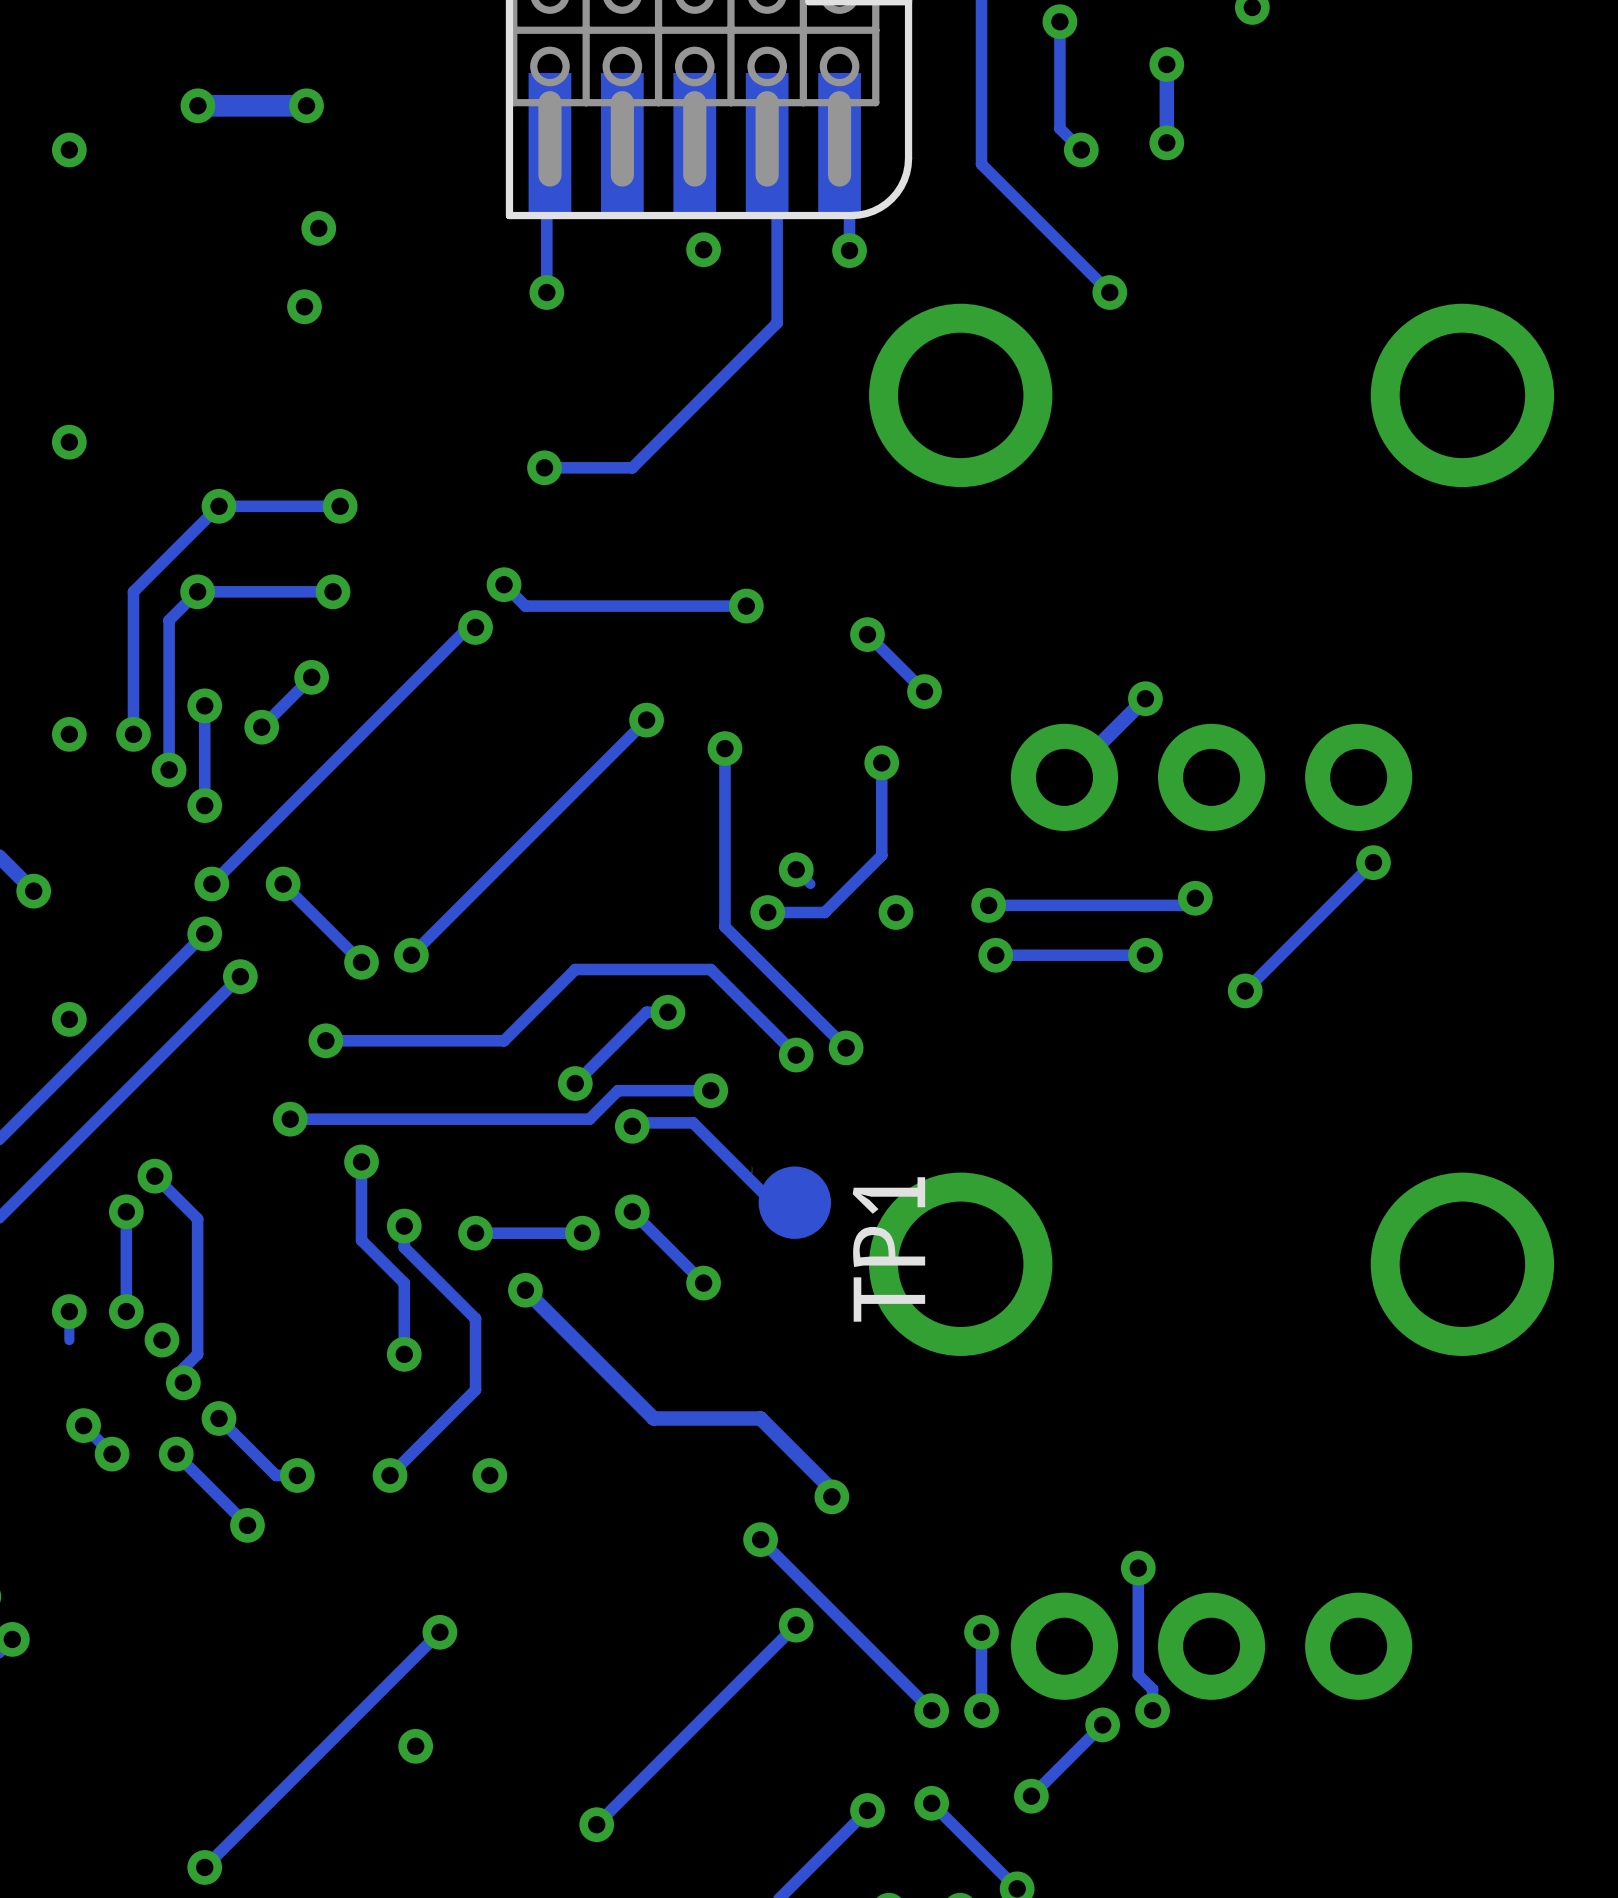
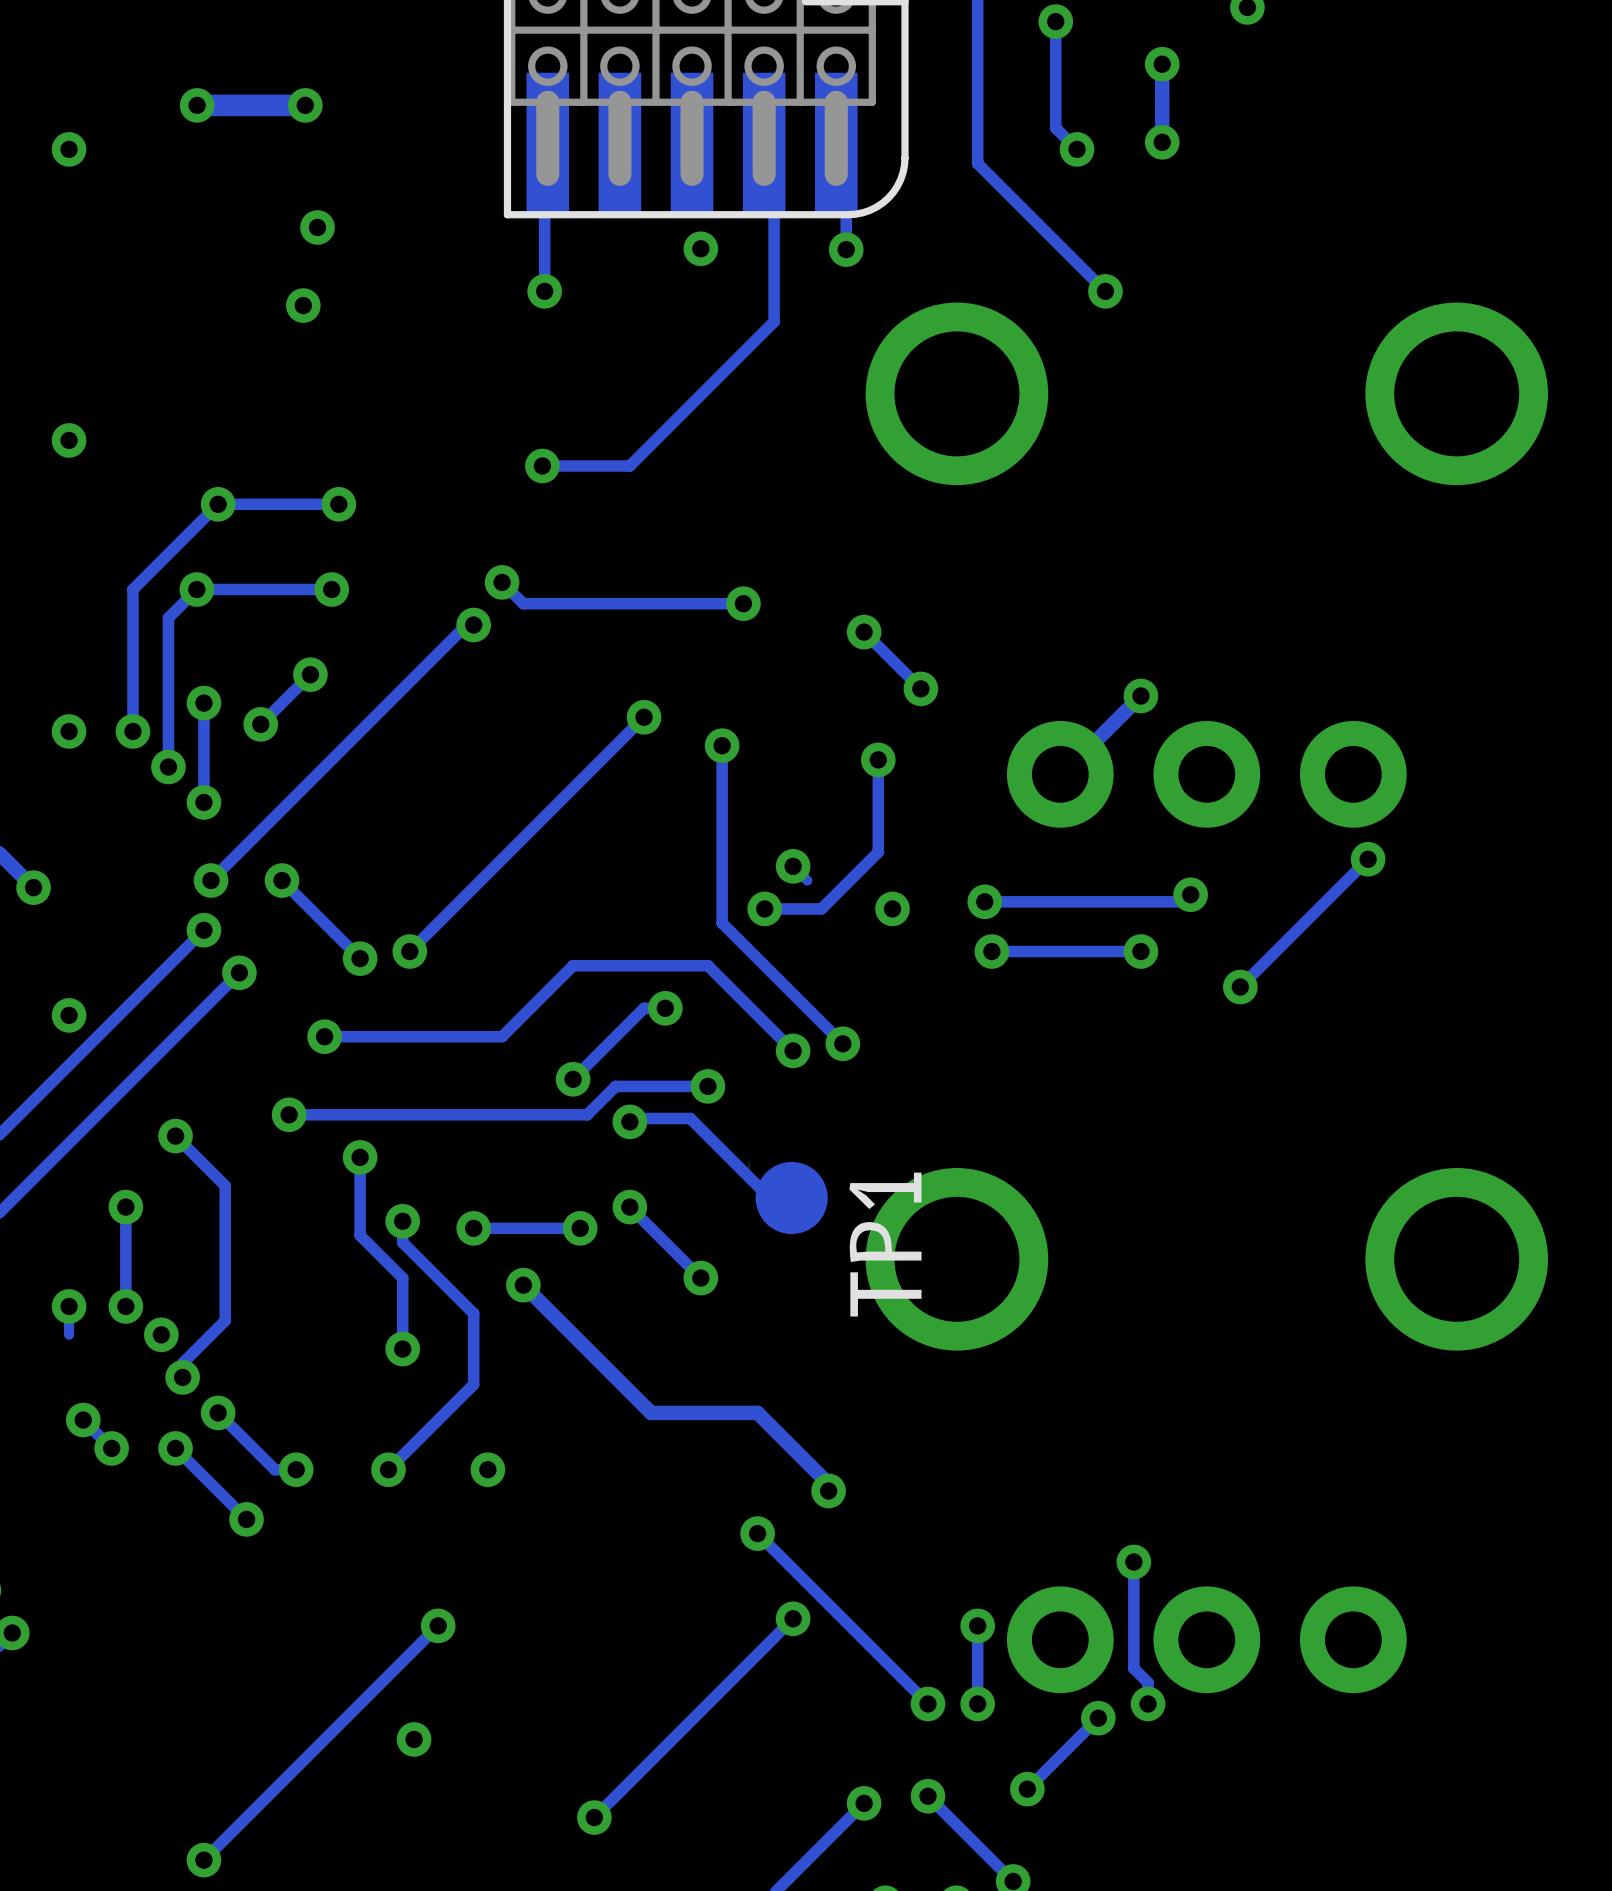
track: (154, 1176) (197, 1218) (197, 1354) -> (175, 1136) (225, 1185) (225, 1320) (196, 1349)
via position: (154, 1176) -> (175, 1136)

